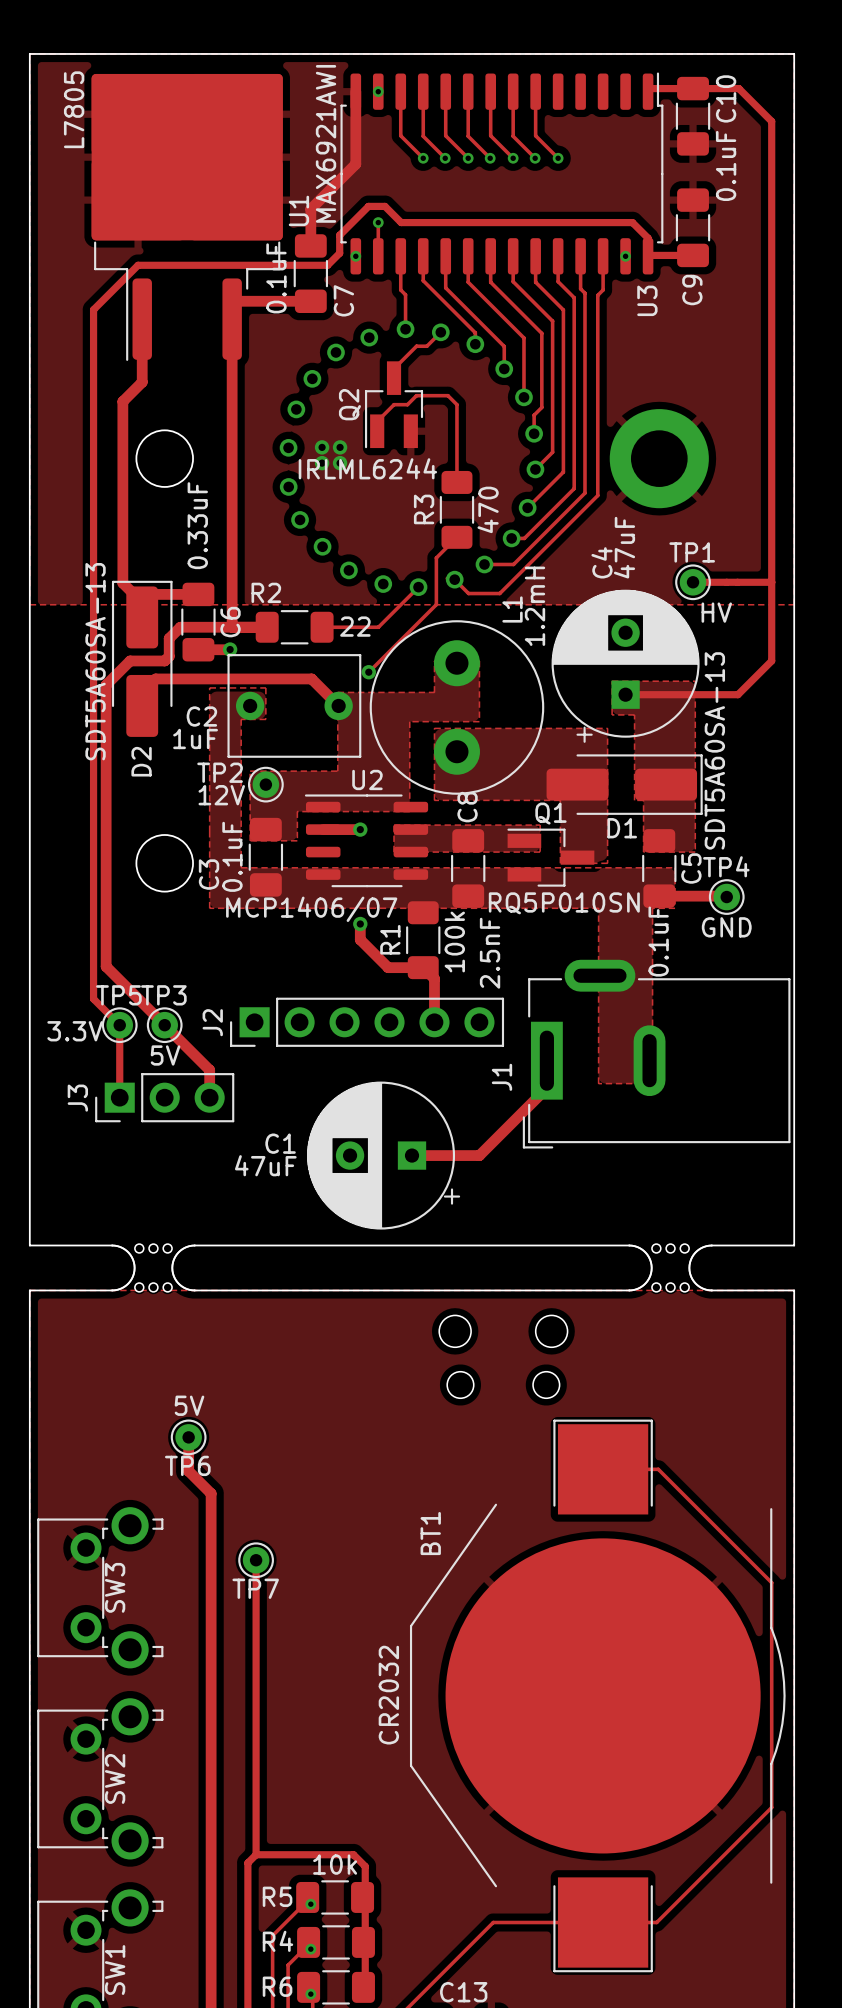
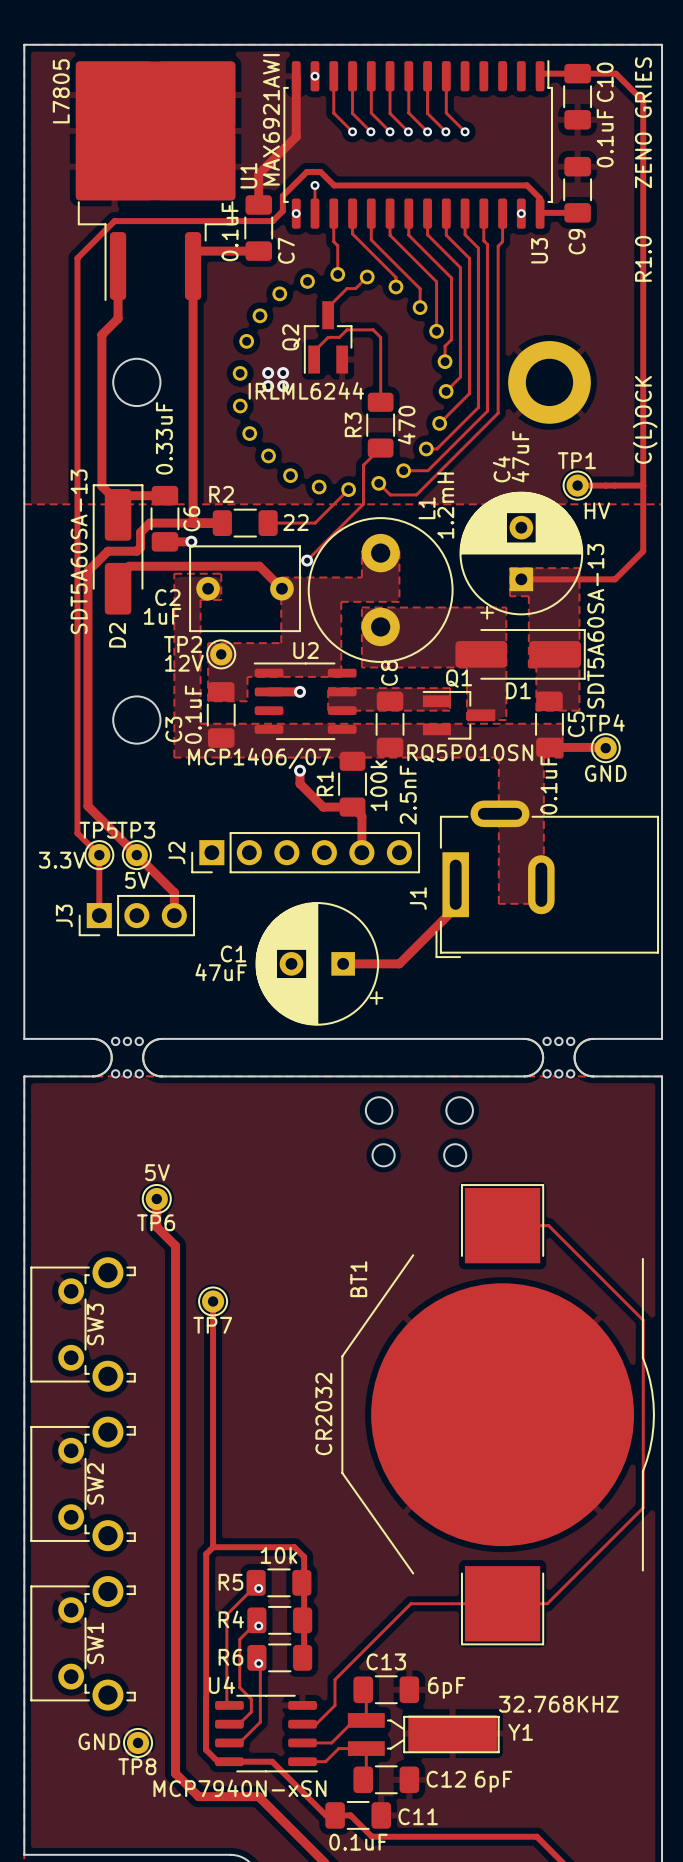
text: none -> C(L)OCK R1.0 ZENO GRIES (645, 260)

